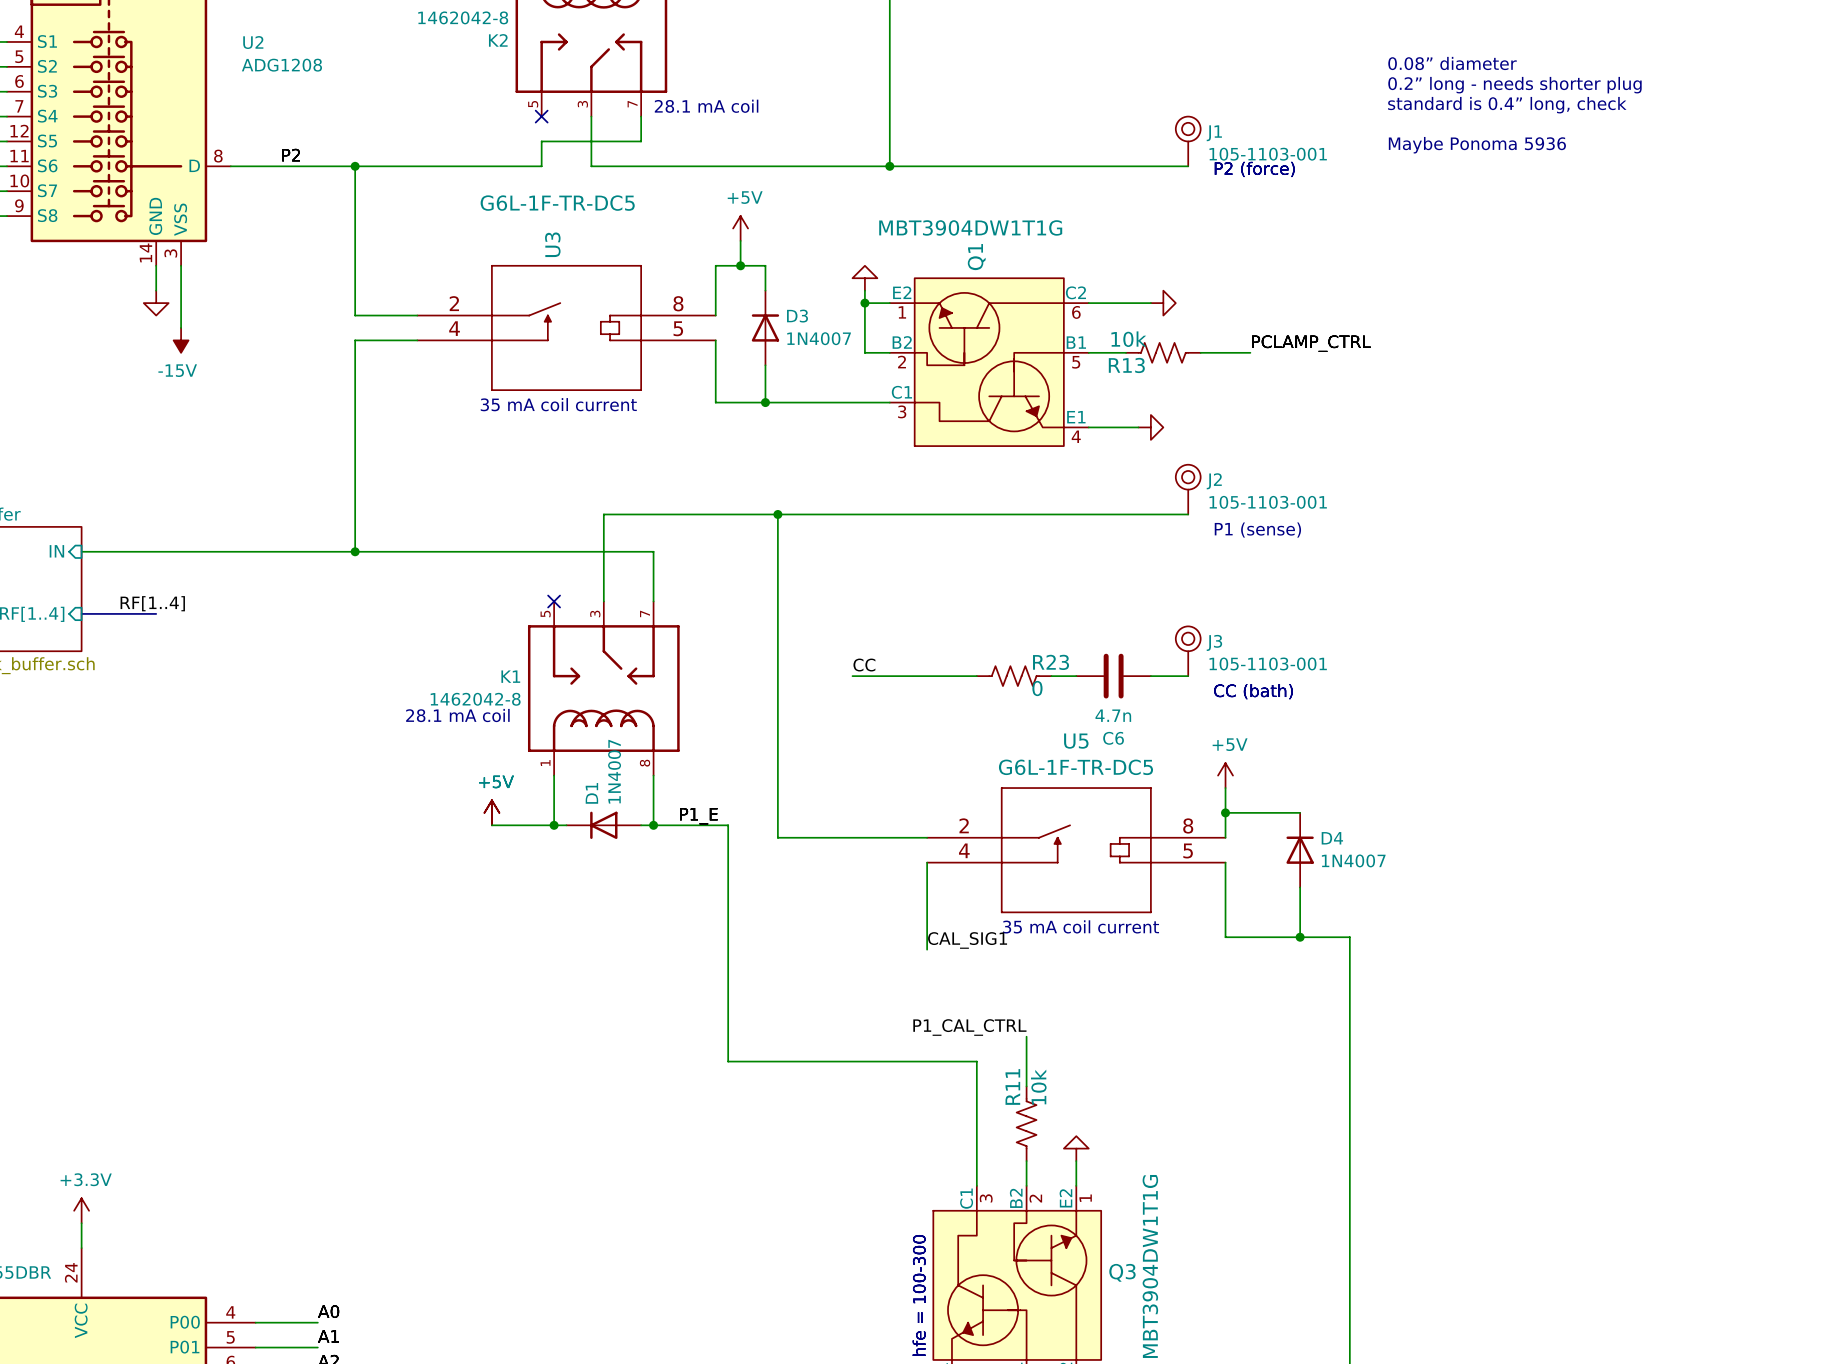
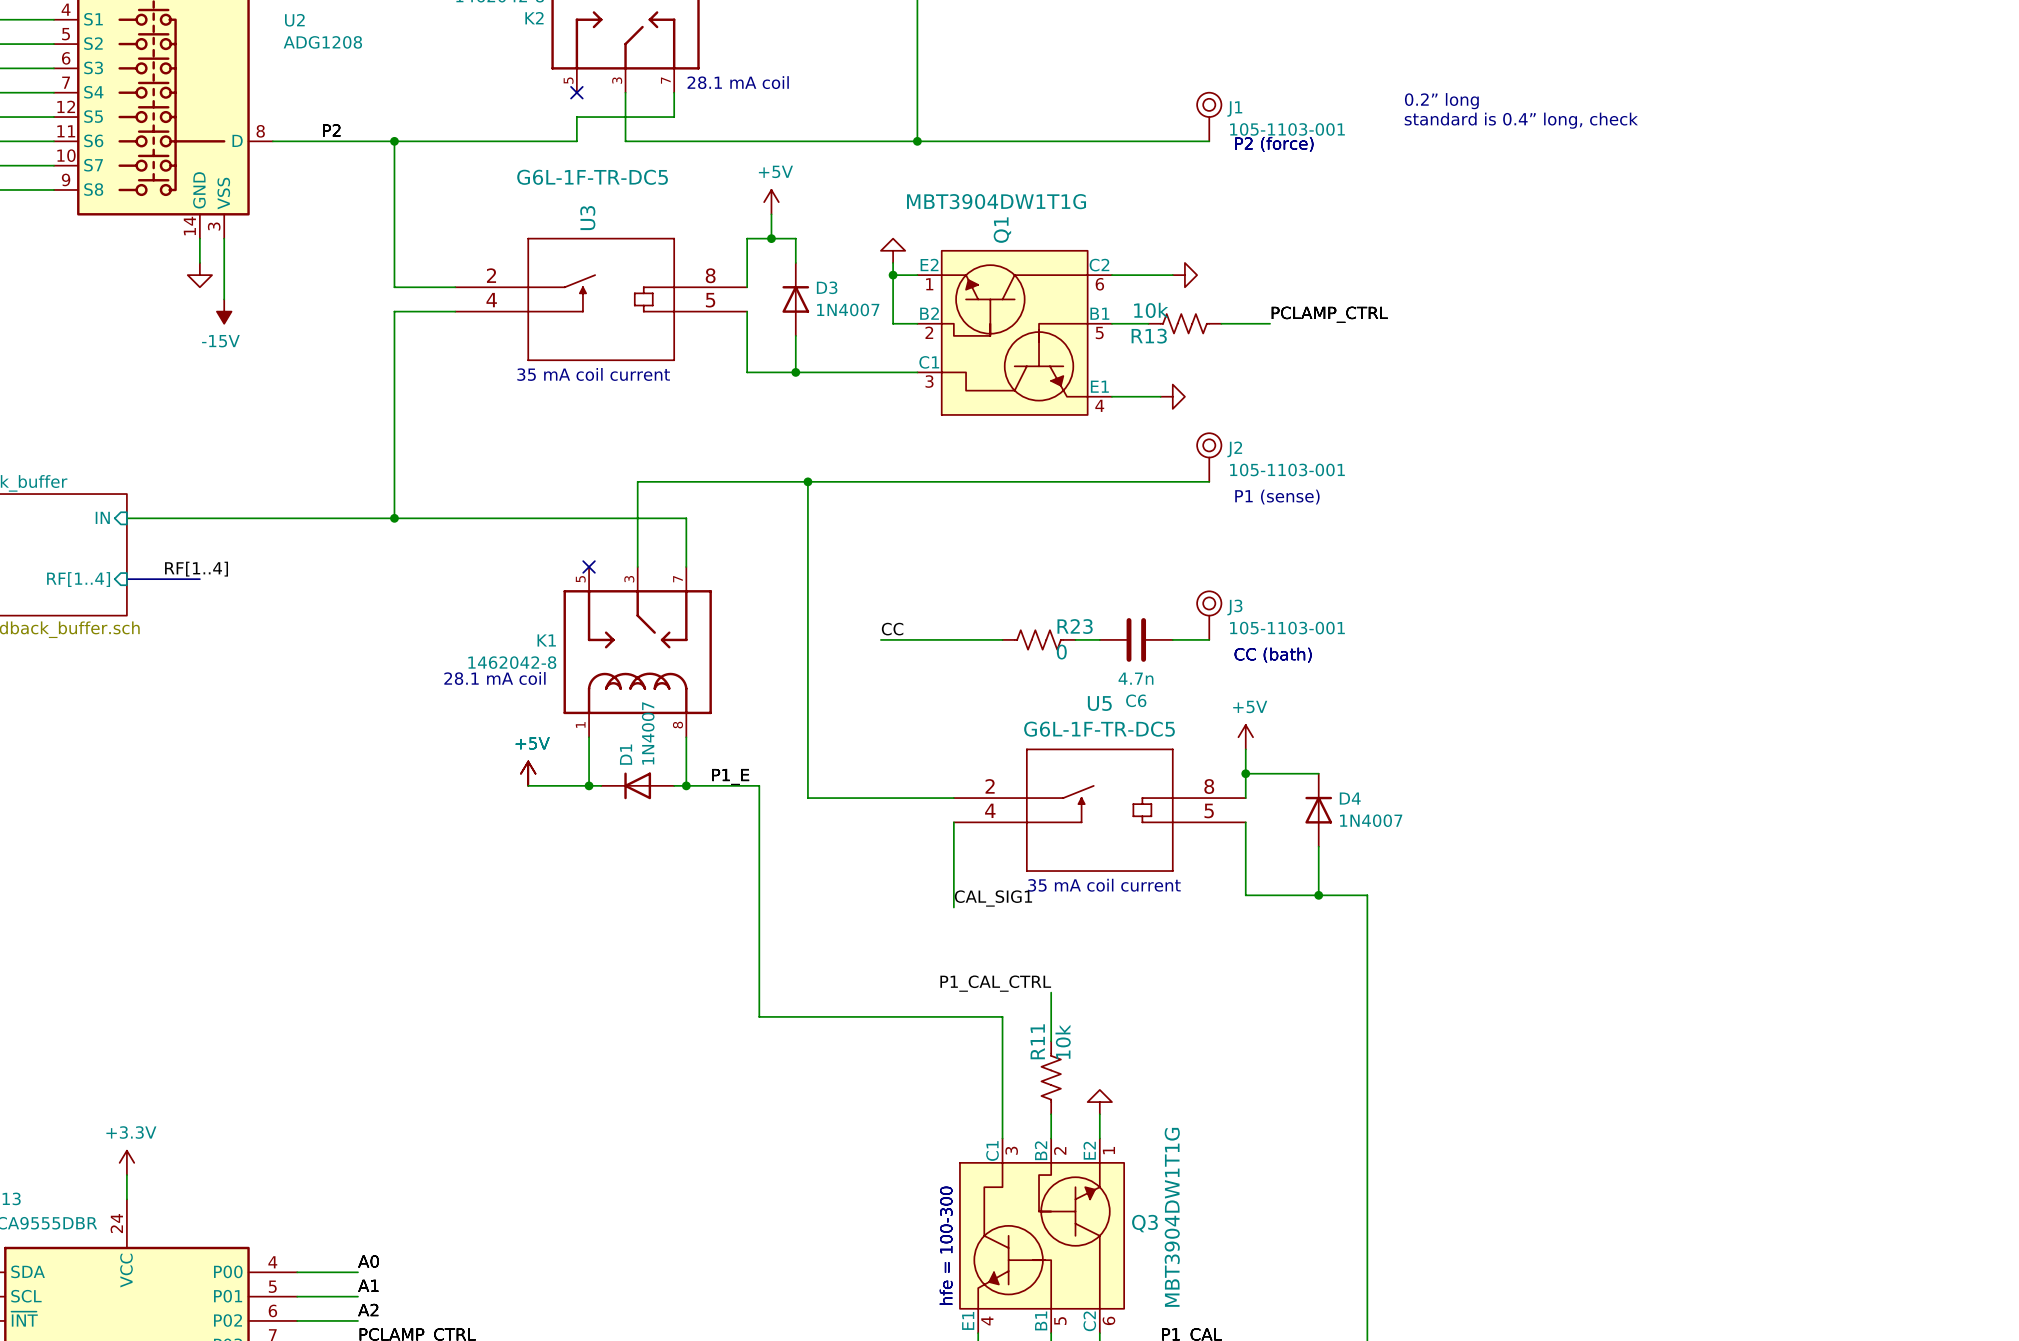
text: 0.08” diameter (1452, 63) -> none
text: 0.2” long - needs shorter plug (1514, 85) -> none
text: standard is 0.4” long, check (1507, 105) -> none
text: none -> 0.2” long (1441, 101)
text: Maybe Ponoma 5936 (1477, 145) -> standard is 0.4” long, check (1521, 120)

